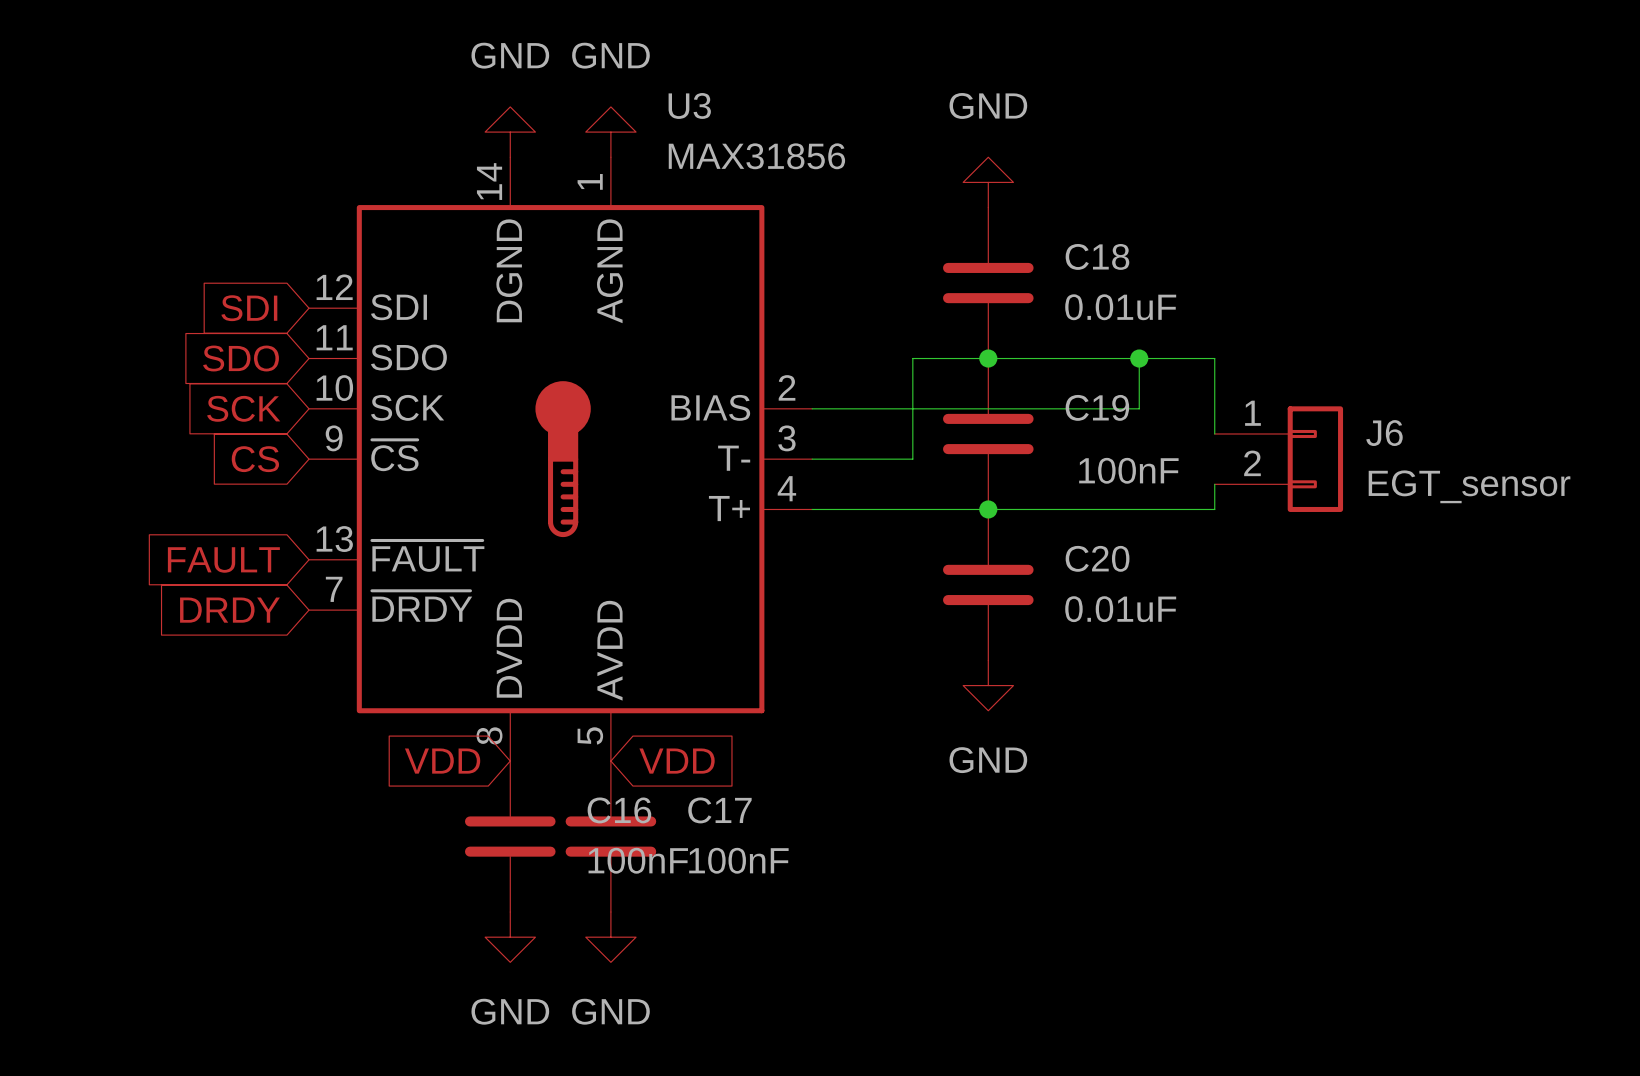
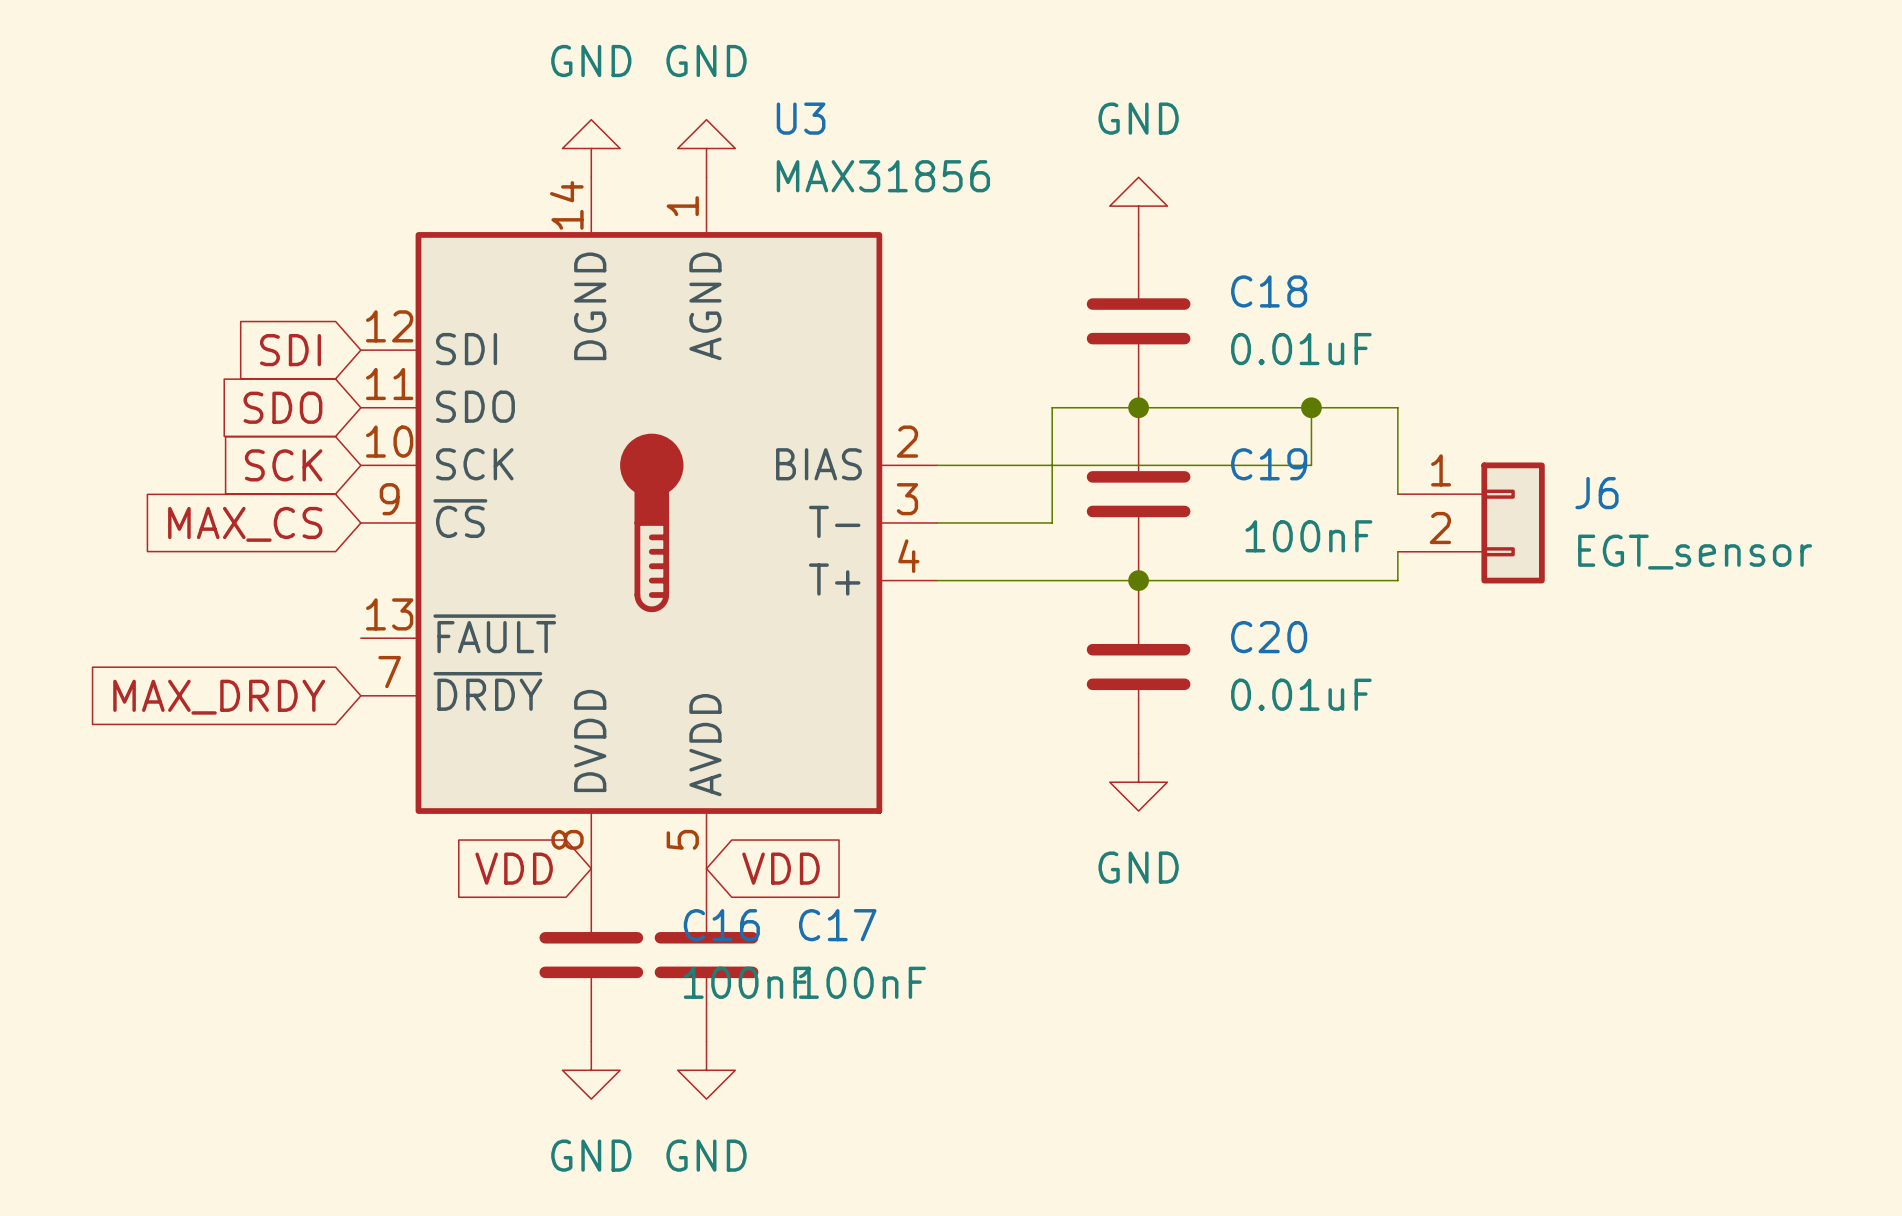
global label: CS (255, 459) -> MAX_CS (245, 524)
global label: FAULT (223, 559) -> none
global label: DRDY (229, 610) -> MAX_DRDY (219, 697)

